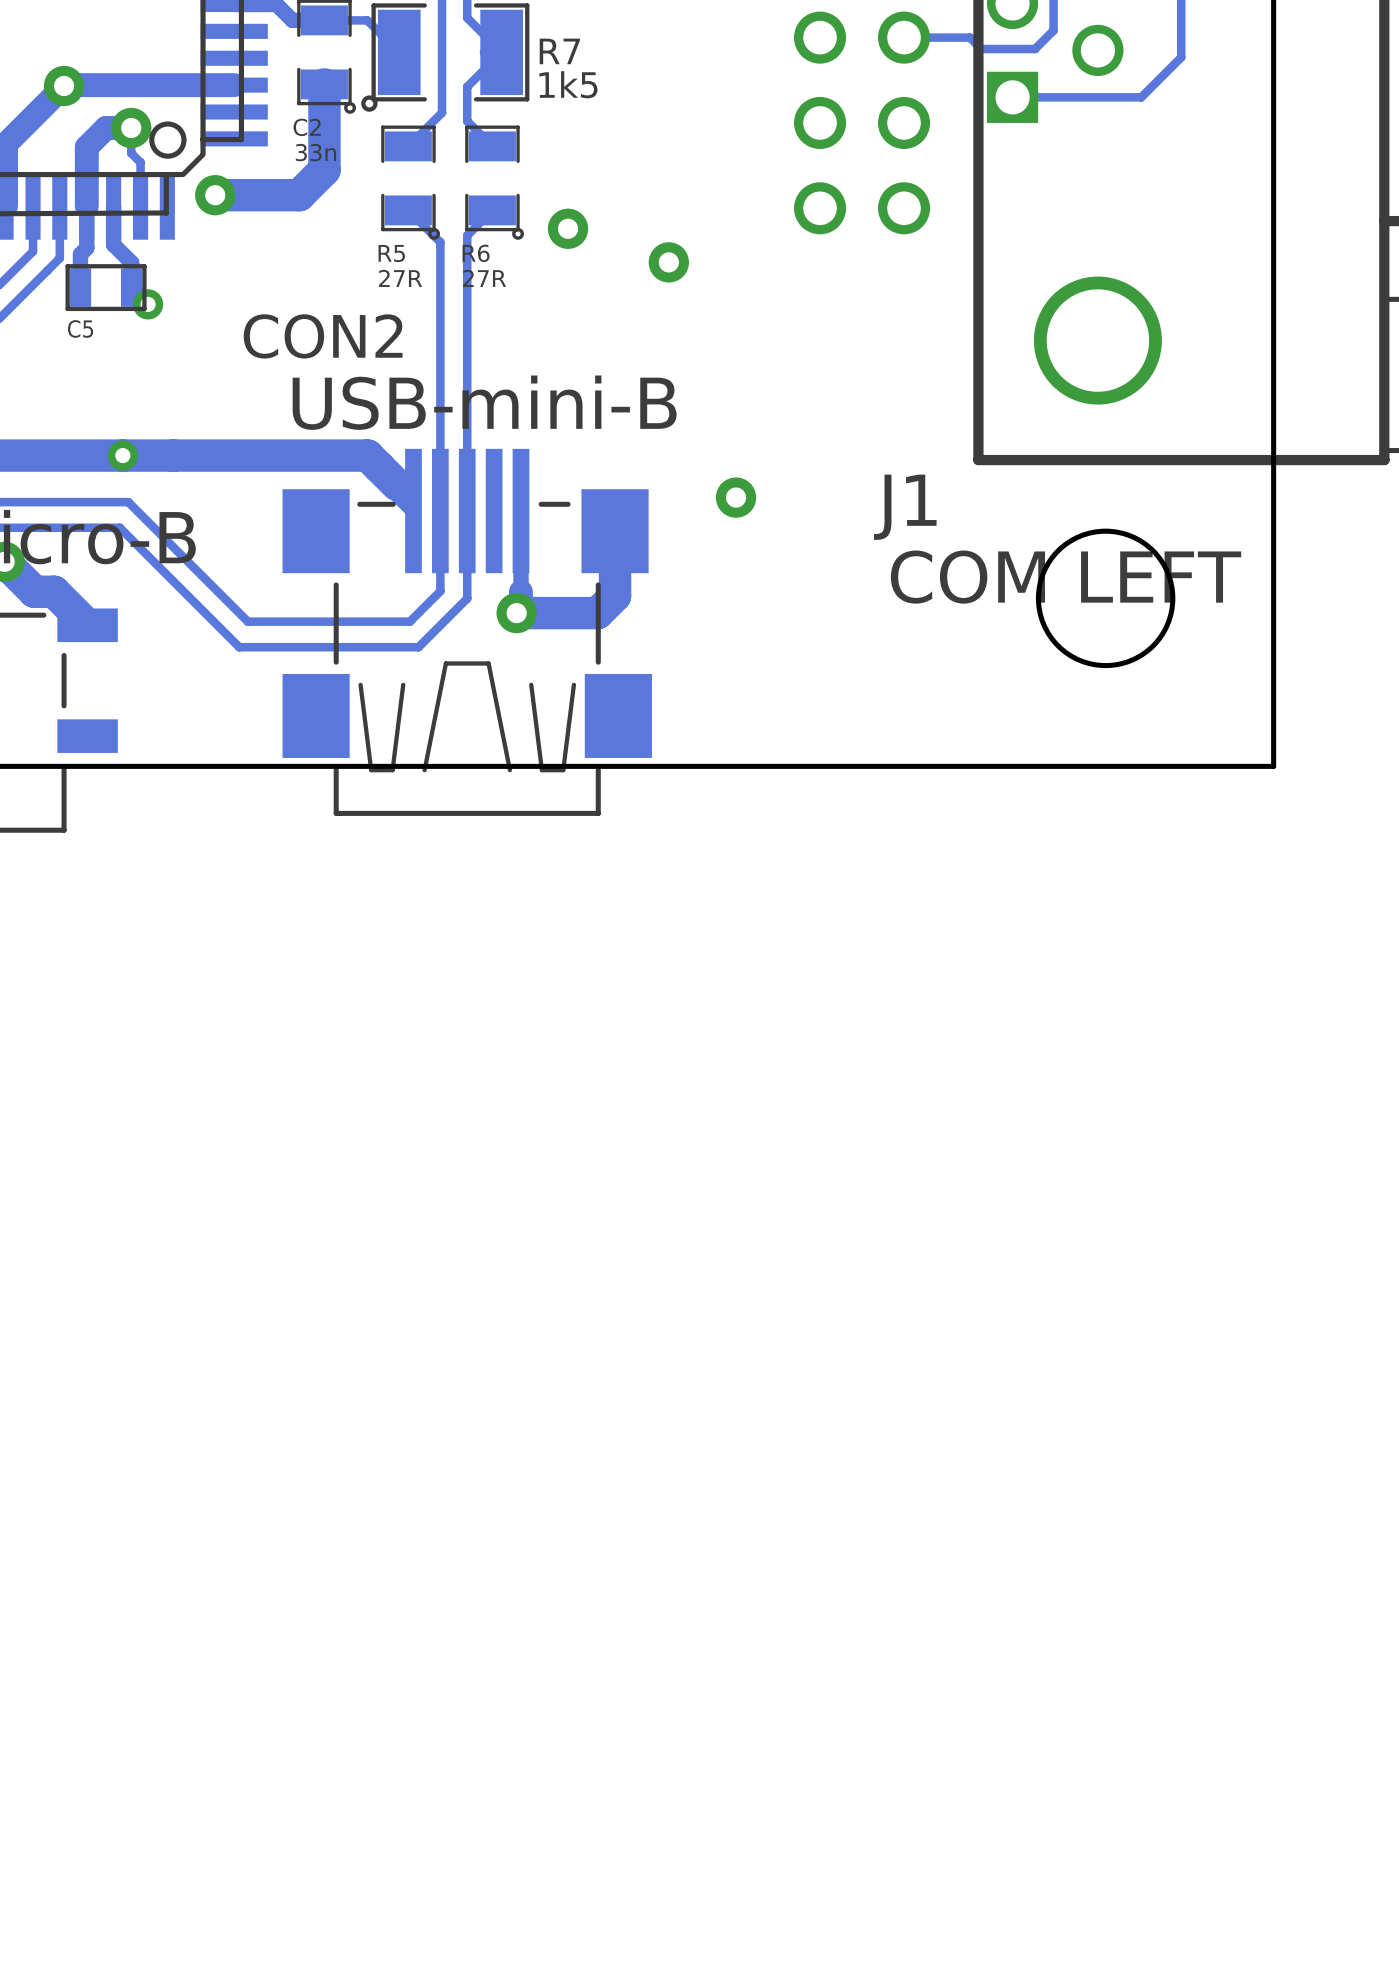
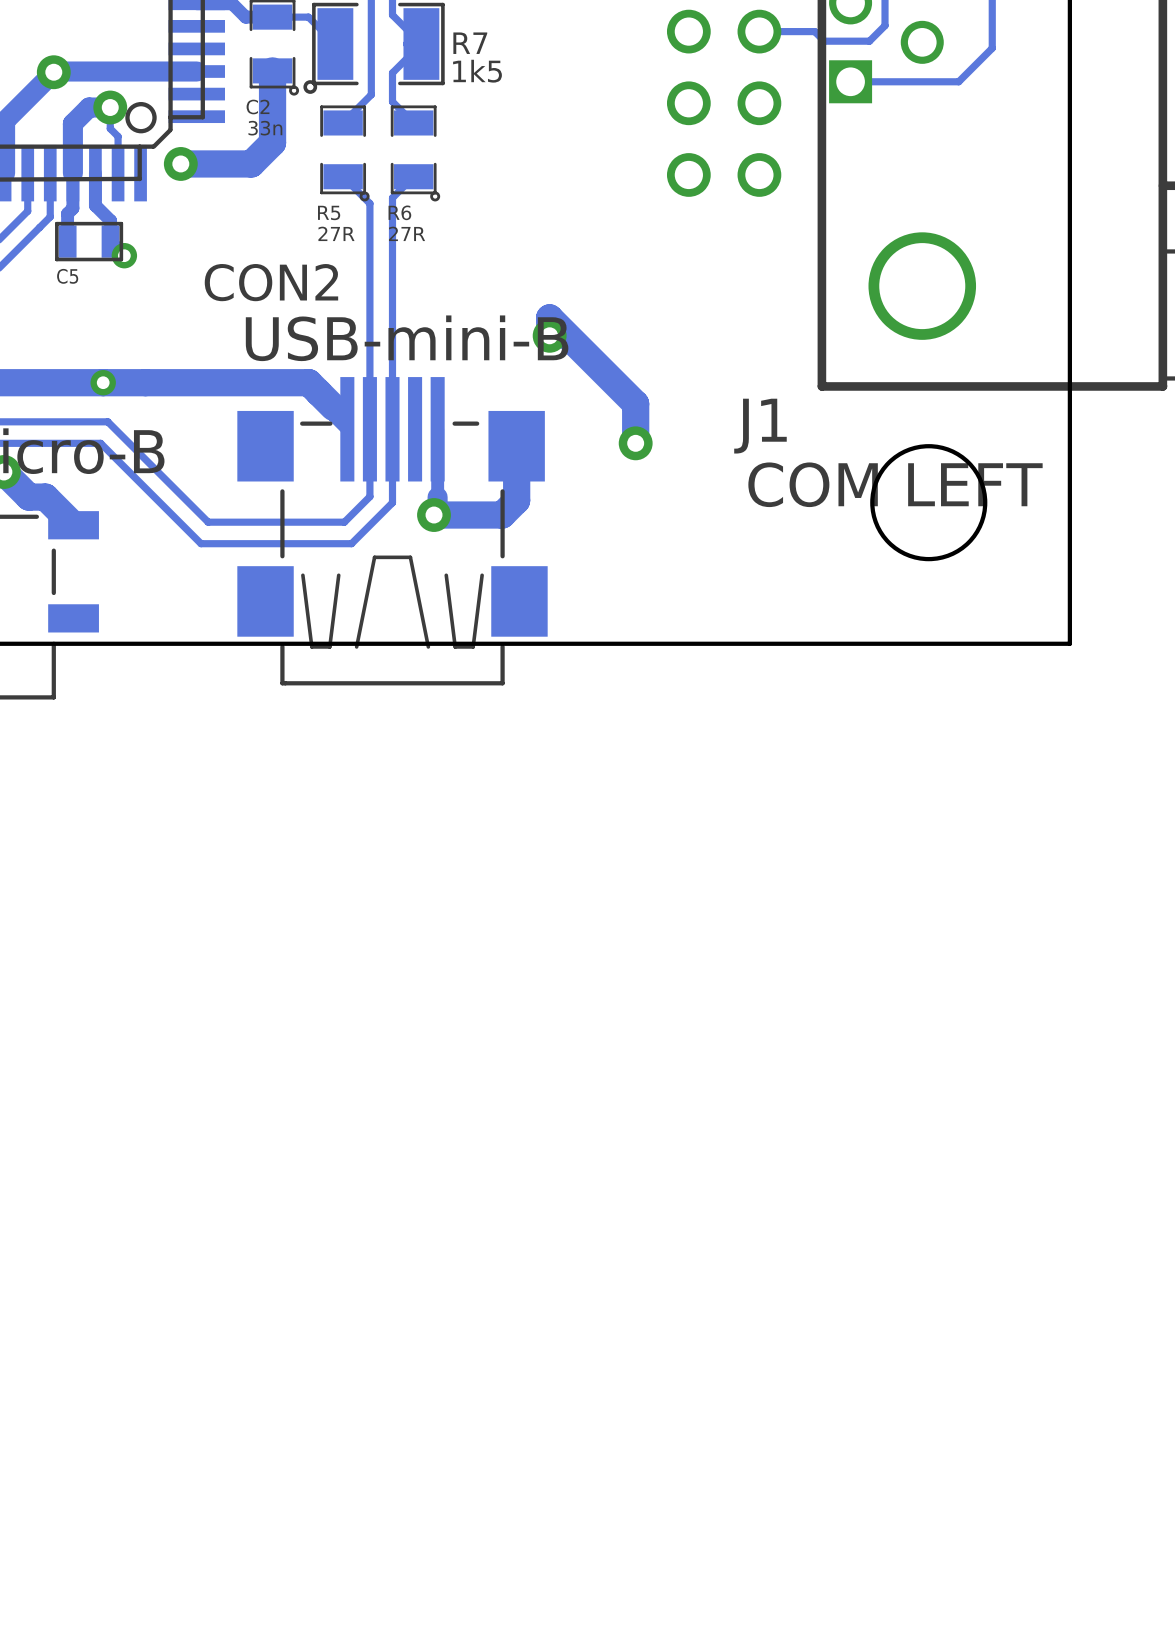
via: (568, 228) -> none
via: (668, 262) -> none
track: none -> (549, 335) (549, 317) (635, 403) (635, 443)
via: none -> (549, 335)
via position: (736, 497) -> (635, 443)

